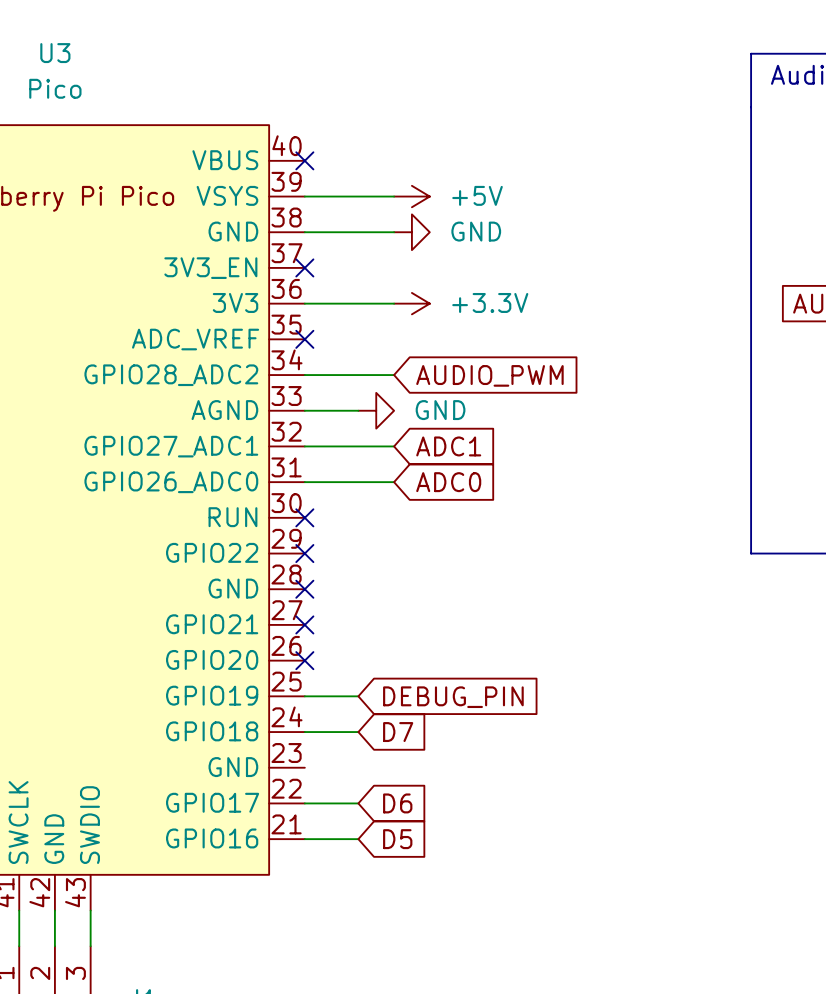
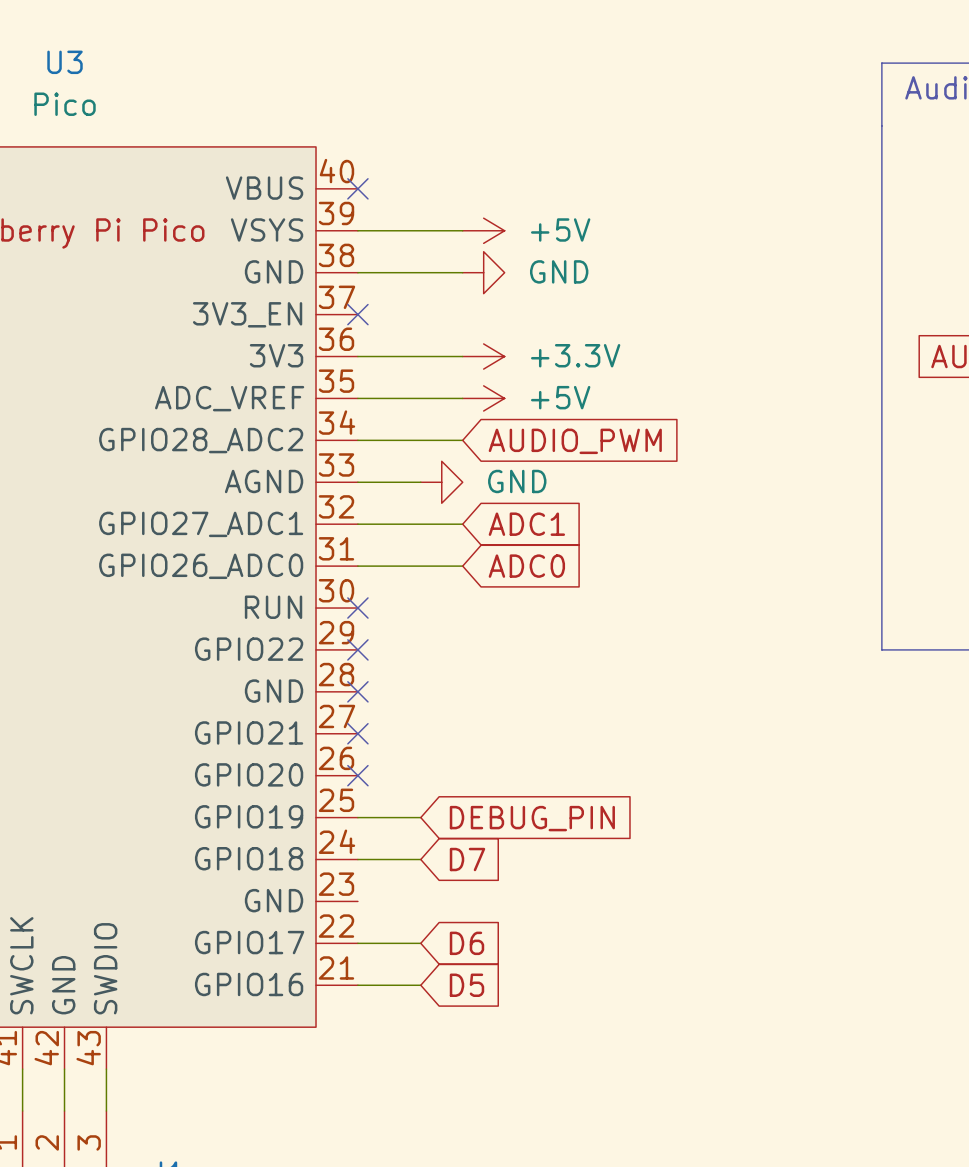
wire: none -> (357, 398) (462, 398)
no-connect mark: (304, 339) -> none
power symbol: none -> +5V (483, 398)

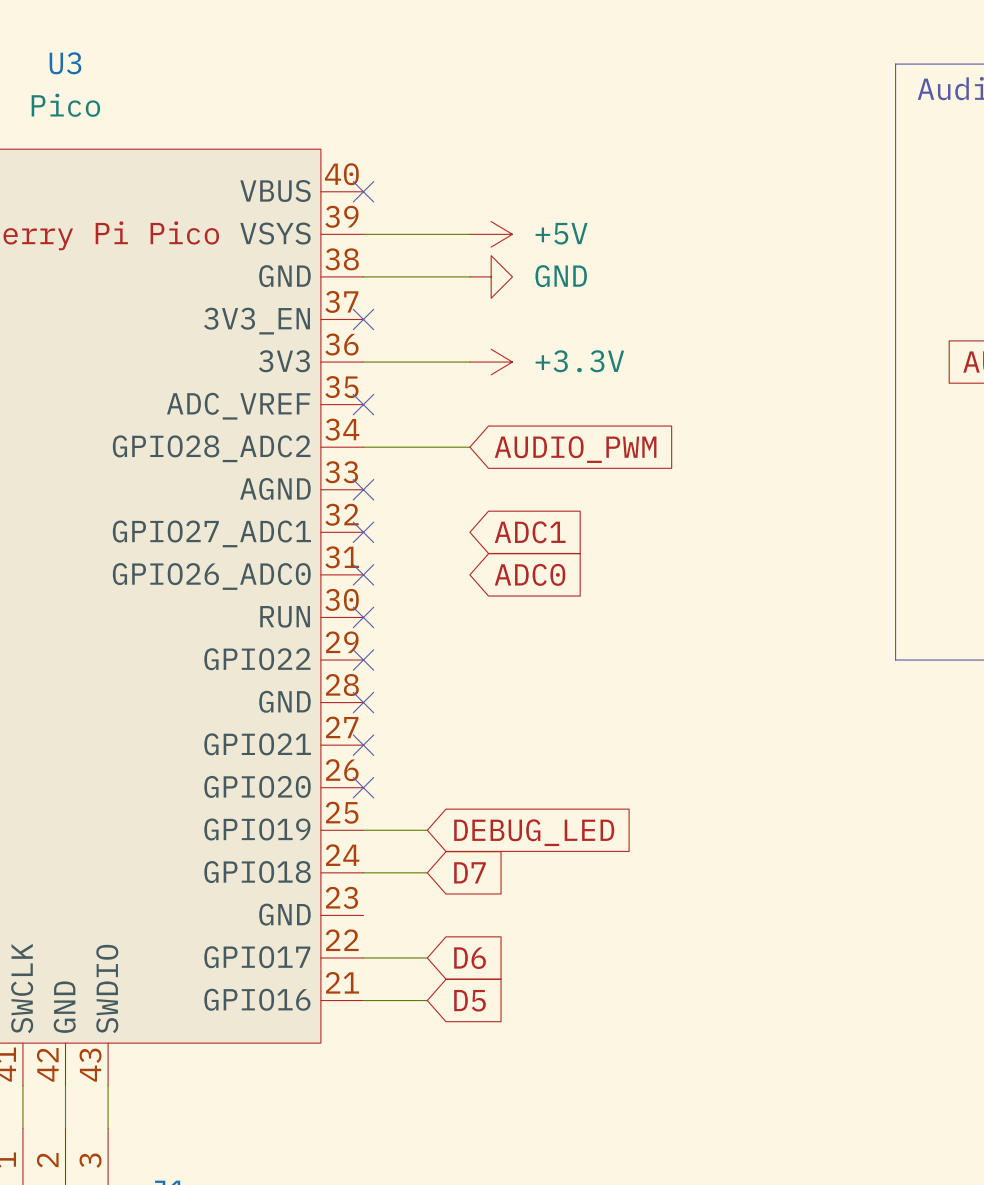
wire: (357, 398) (462, 398) -> none
no-connect mark: none -> (363, 404)
power symbol: +5V (483, 398) -> none
wire: (357, 482) (420, 482) -> none
no-connect mark: none -> (363, 489)
power symbol: GND (441, 482) -> none
wire: (357, 524) (462, 524) -> none
no-connect mark: none -> (363, 532)
wire: (357, 566) (462, 566) -> none
no-connect mark: none -> (363, 574)
global label: DEBUG_PIN (532, 818) -> DEBUG_LED (534, 832)

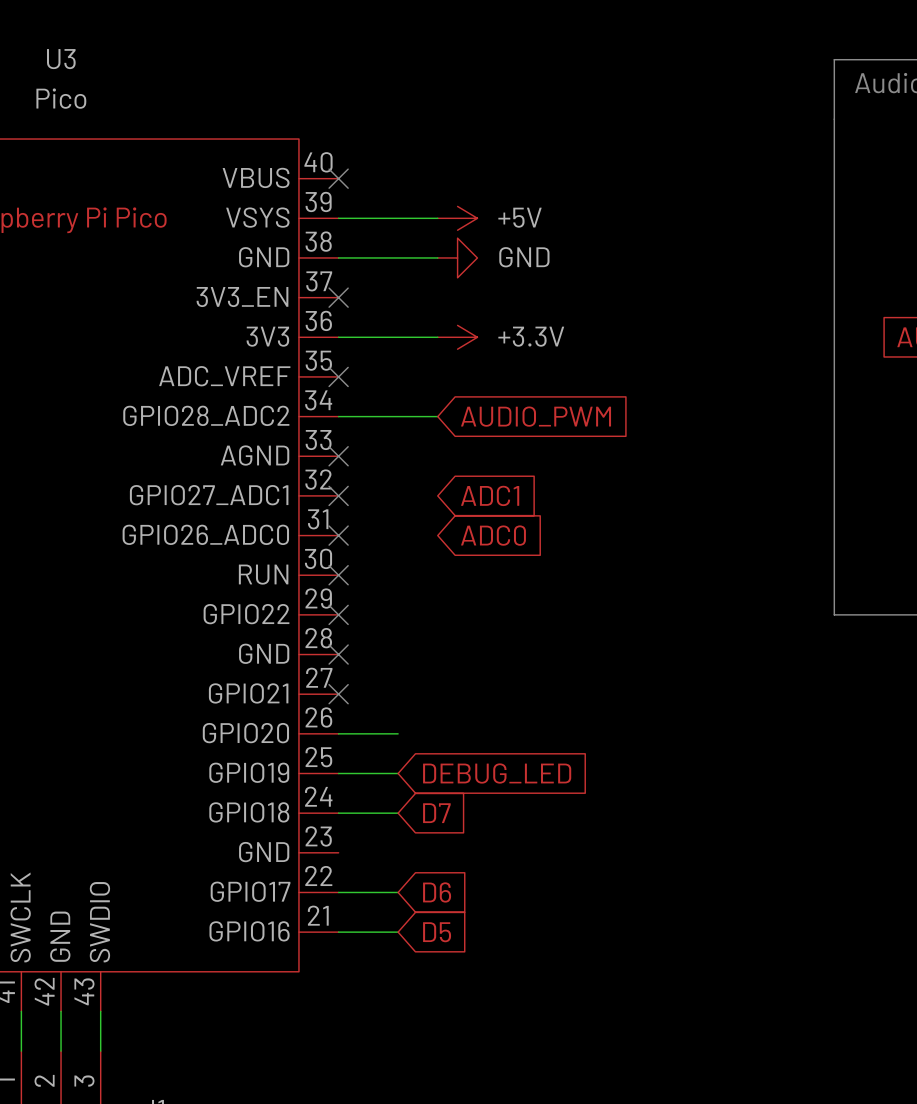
wire: none -> (338, 733) (398, 733)
no-connect mark: (363, 787) -> none

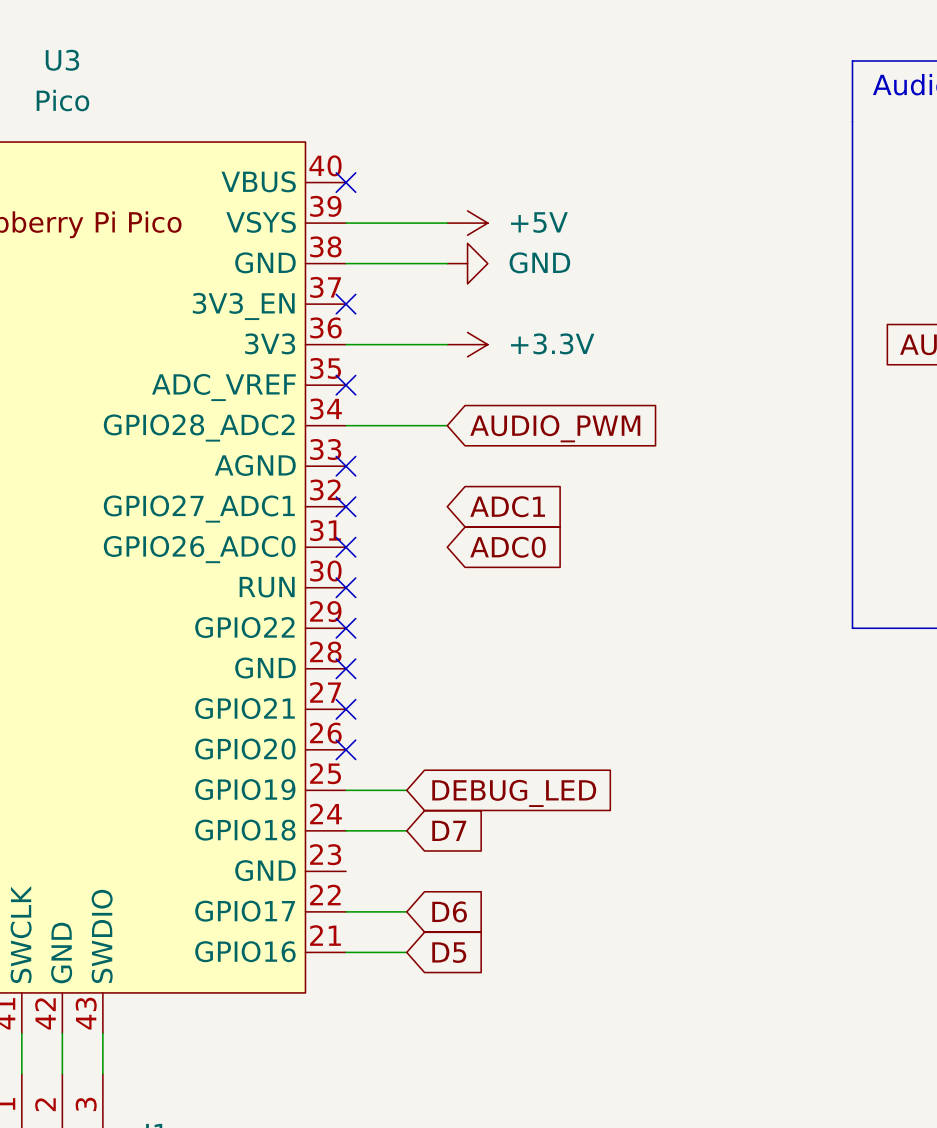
wire: (338, 733) (398, 733) -> none
no-connect mark: none -> (345, 749)

